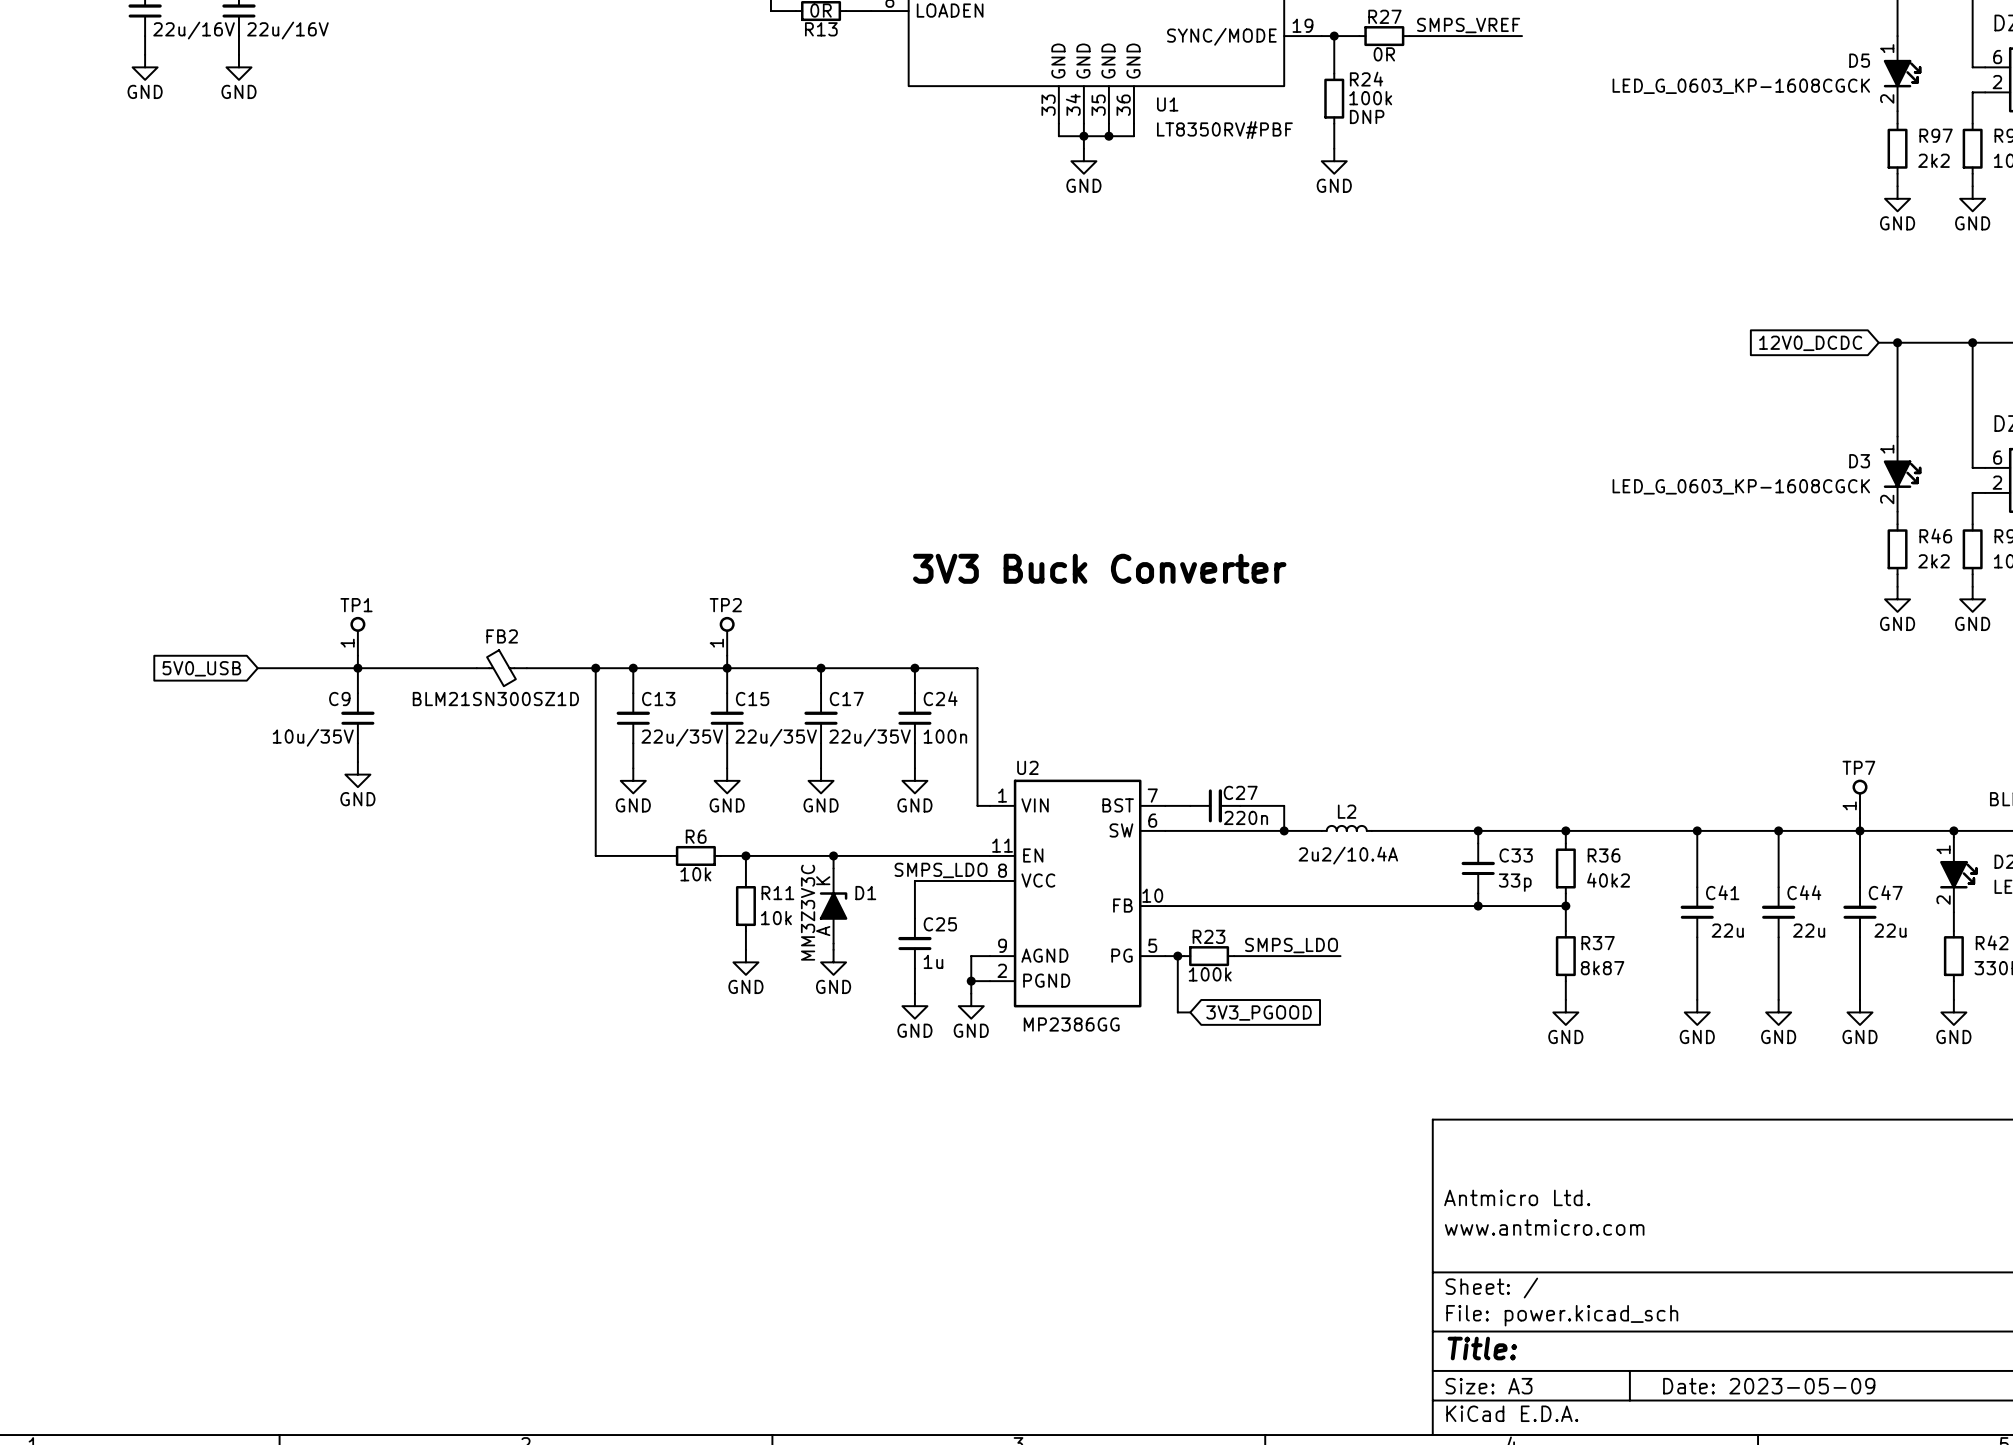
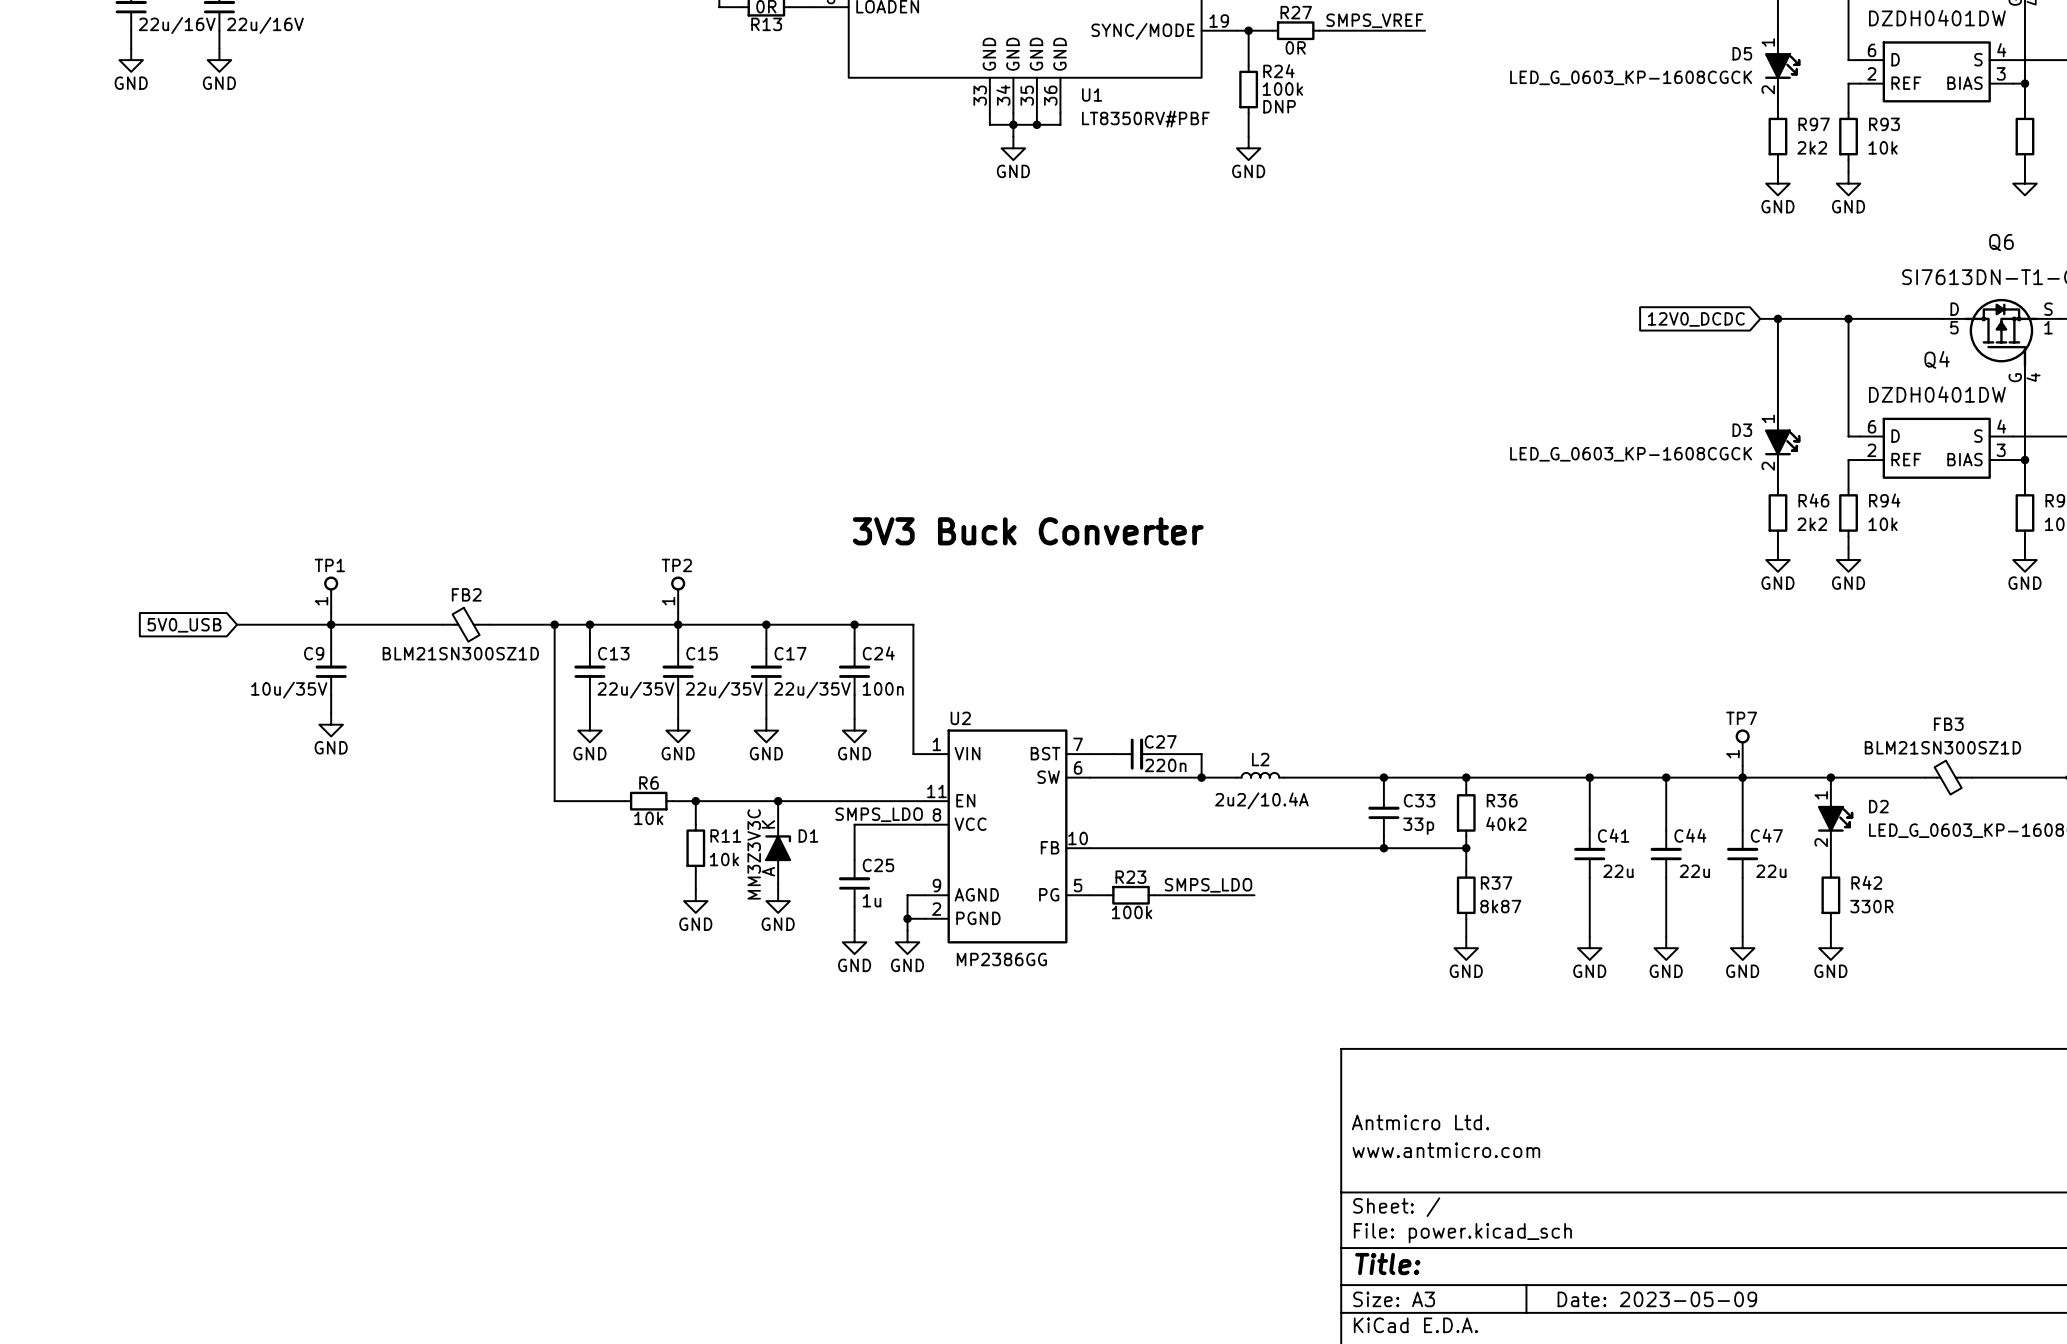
wire: (1177, 956) (1177, 1012) (1190, 1012) -> none
junction: (1177, 956) -> none
global label: 3V3_PGOOD (1259, 1013) -> none

